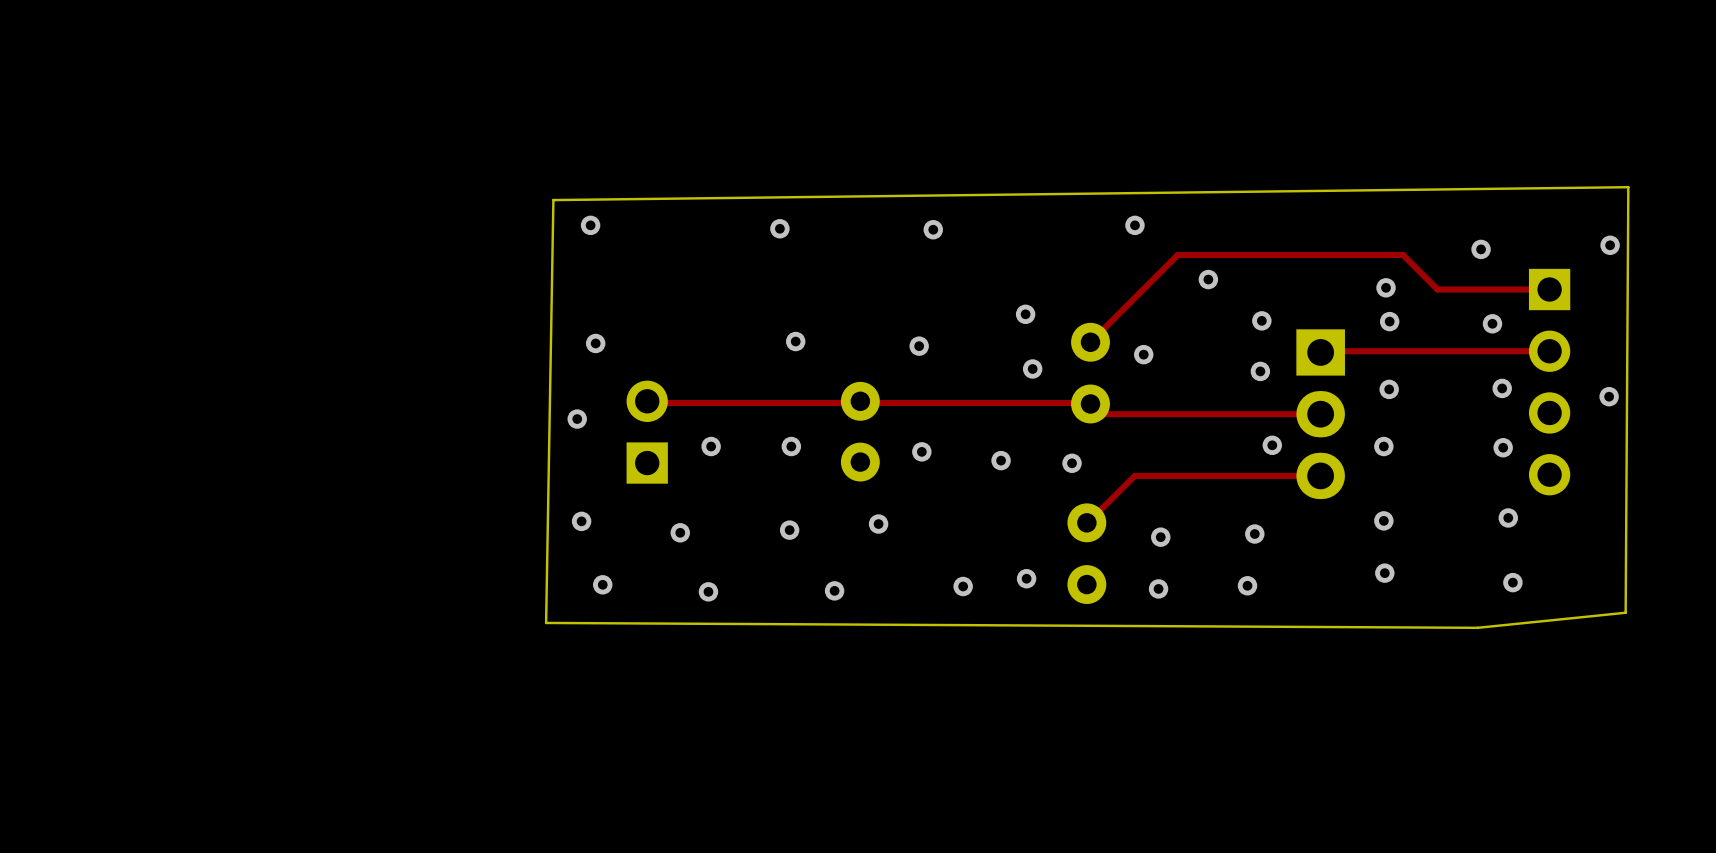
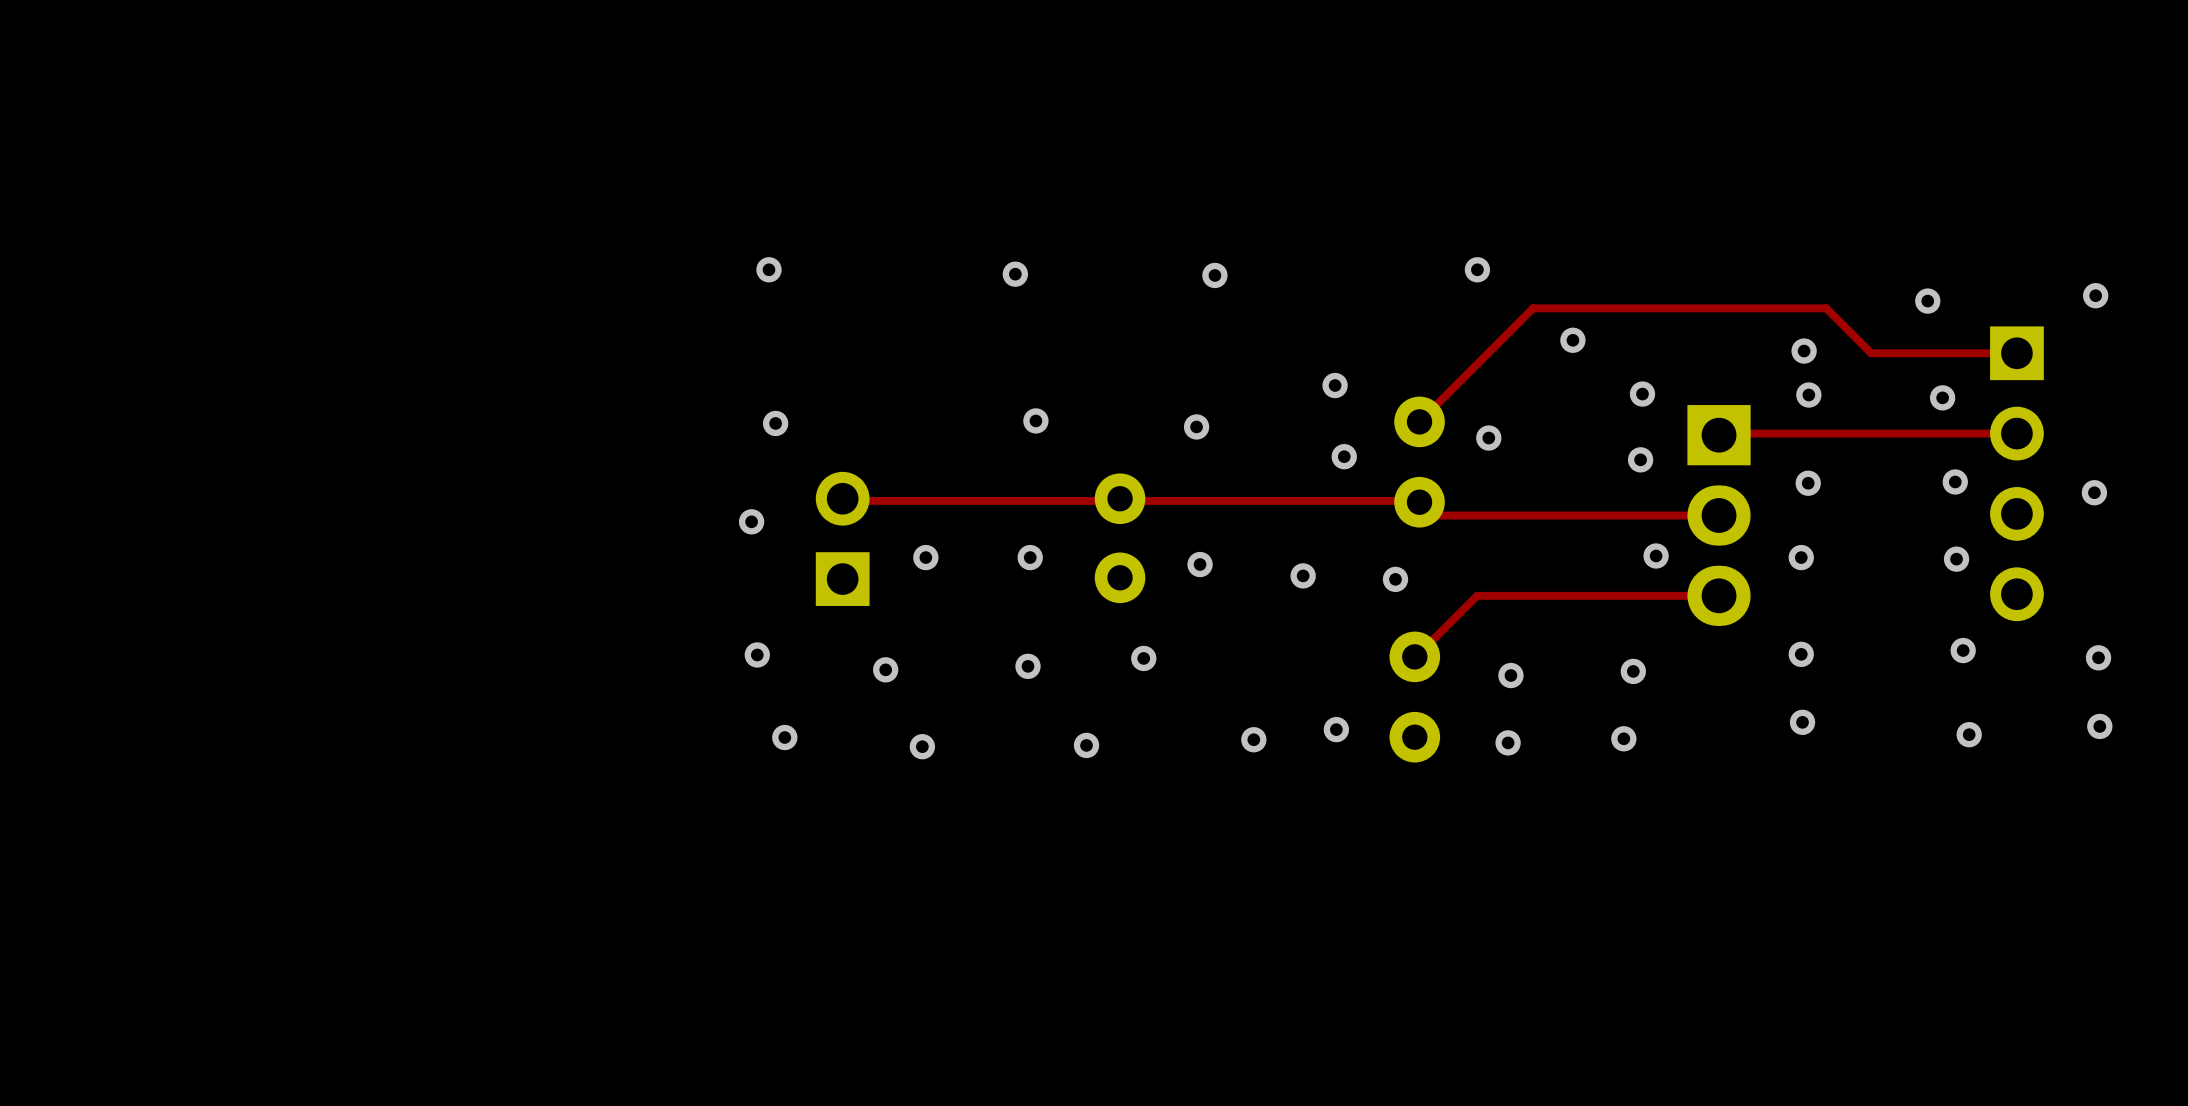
board edge: (1628, 187) (553, 200) (546, 622) (1477, 627) (1625, 612) (1628, 187) -> none
via: none -> (2098, 657)
via: none -> (2099, 726)

